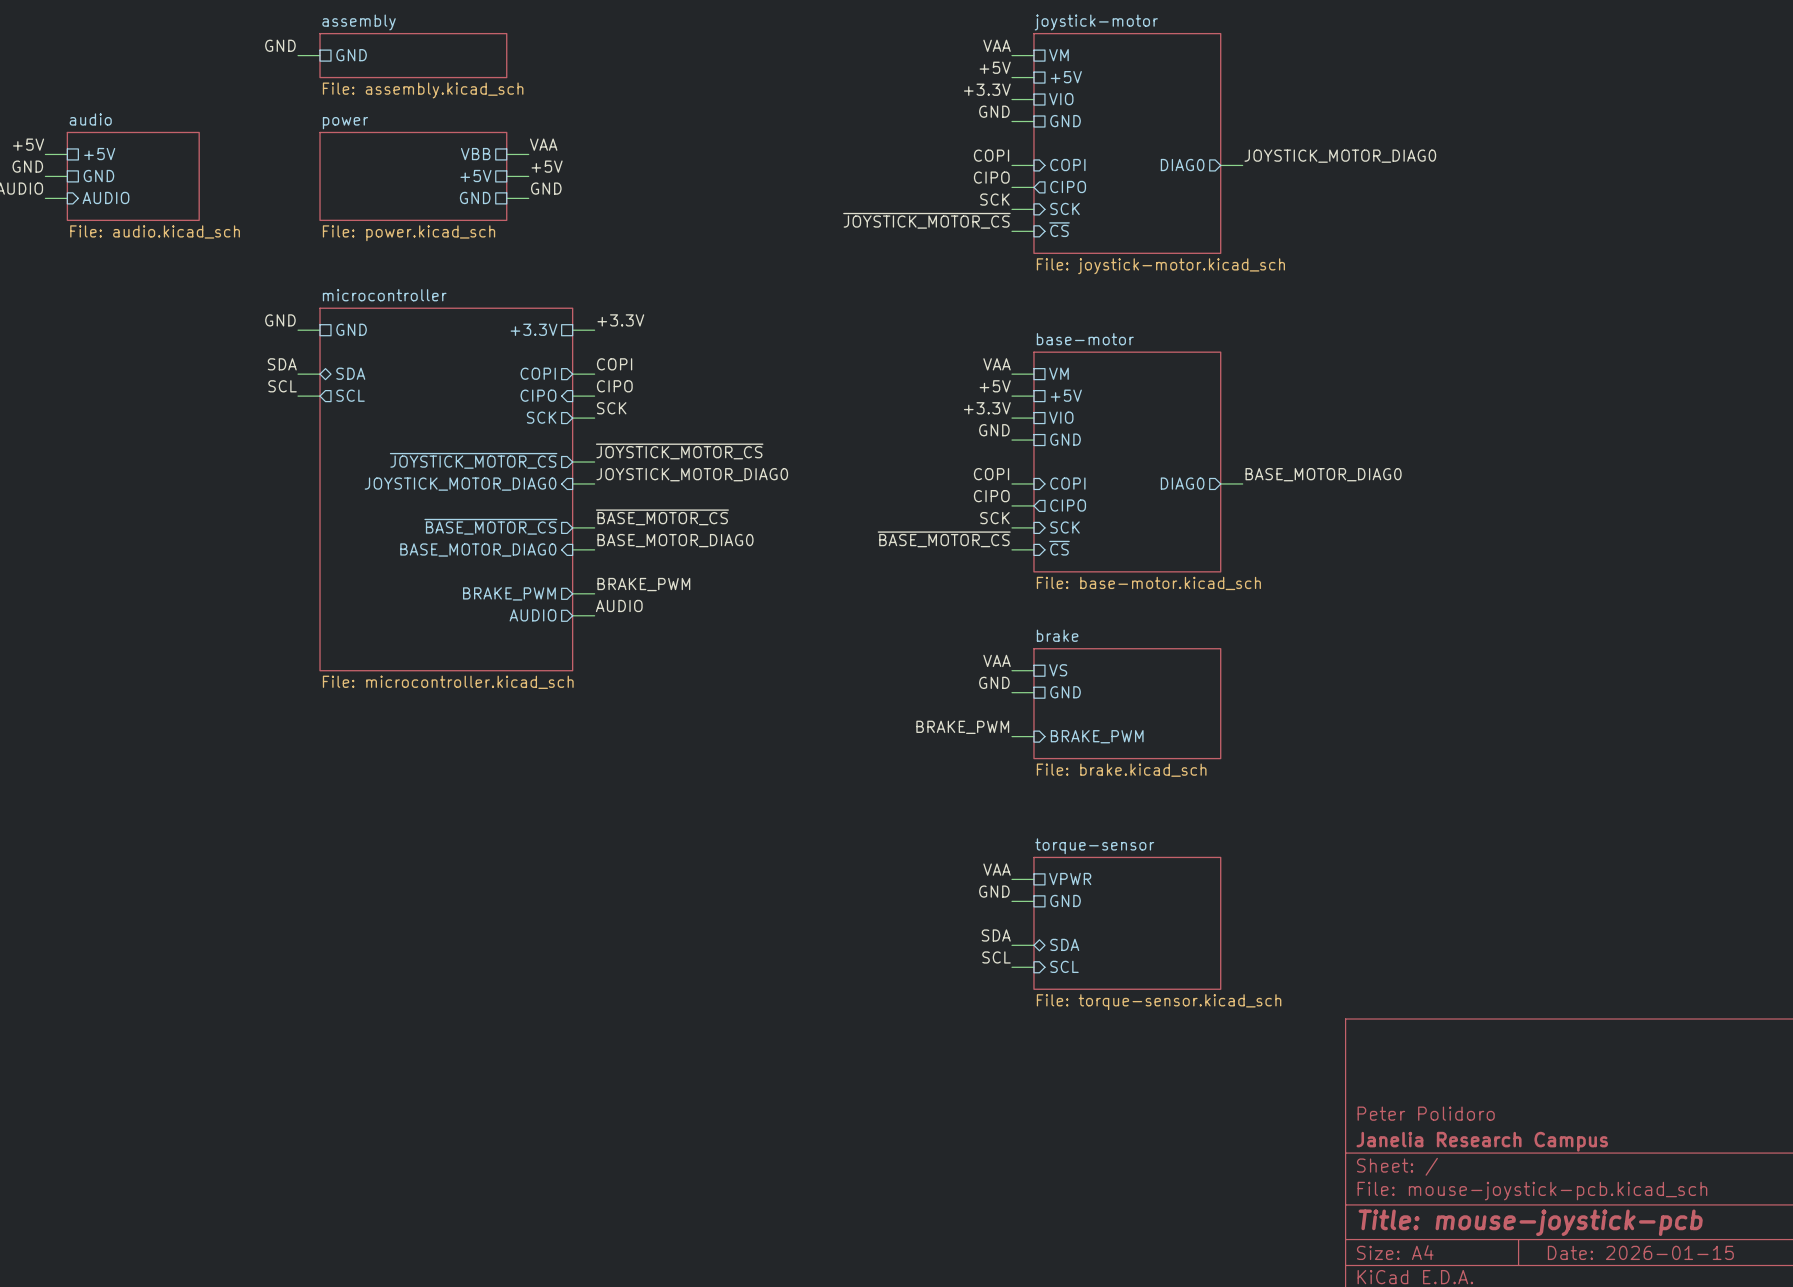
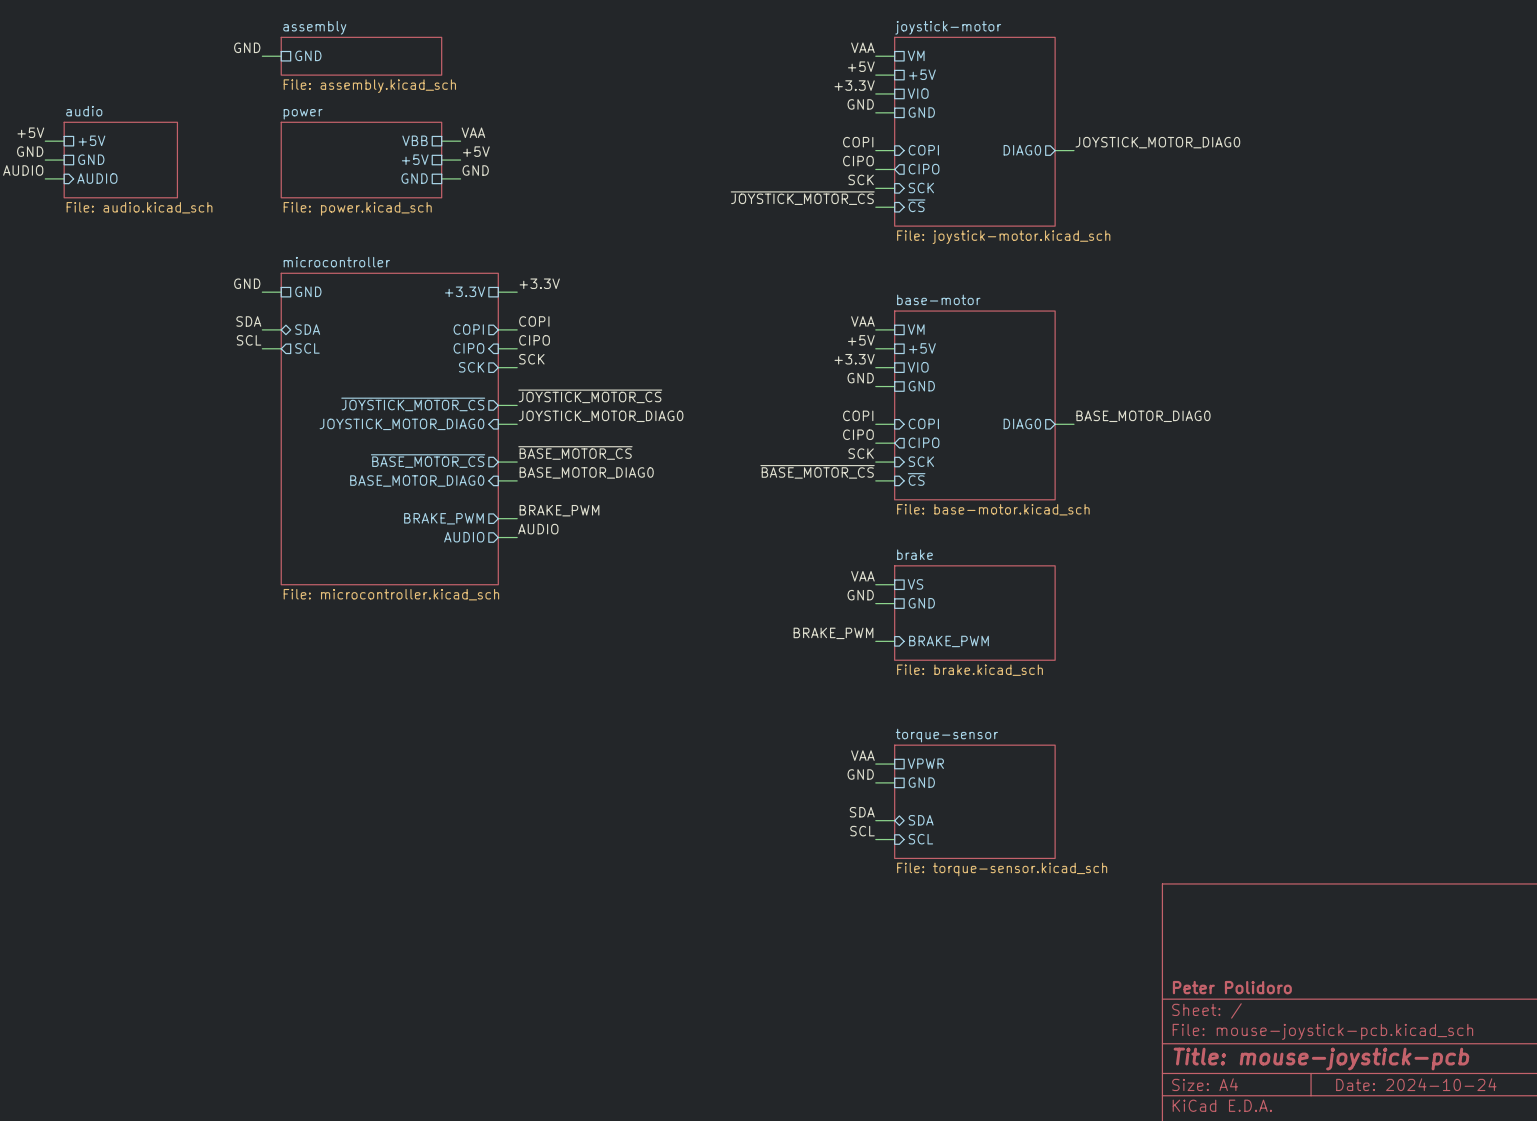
title block: Peter Polidoro (1426, 1113) -> none
title block: Janelia Research Campus (1482, 1141) -> Peter Polidoro (1232, 987)
title block: Date: 2026-01-15 (1640, 1252) -> Date: 2024-10-24 (1416, 1084)

